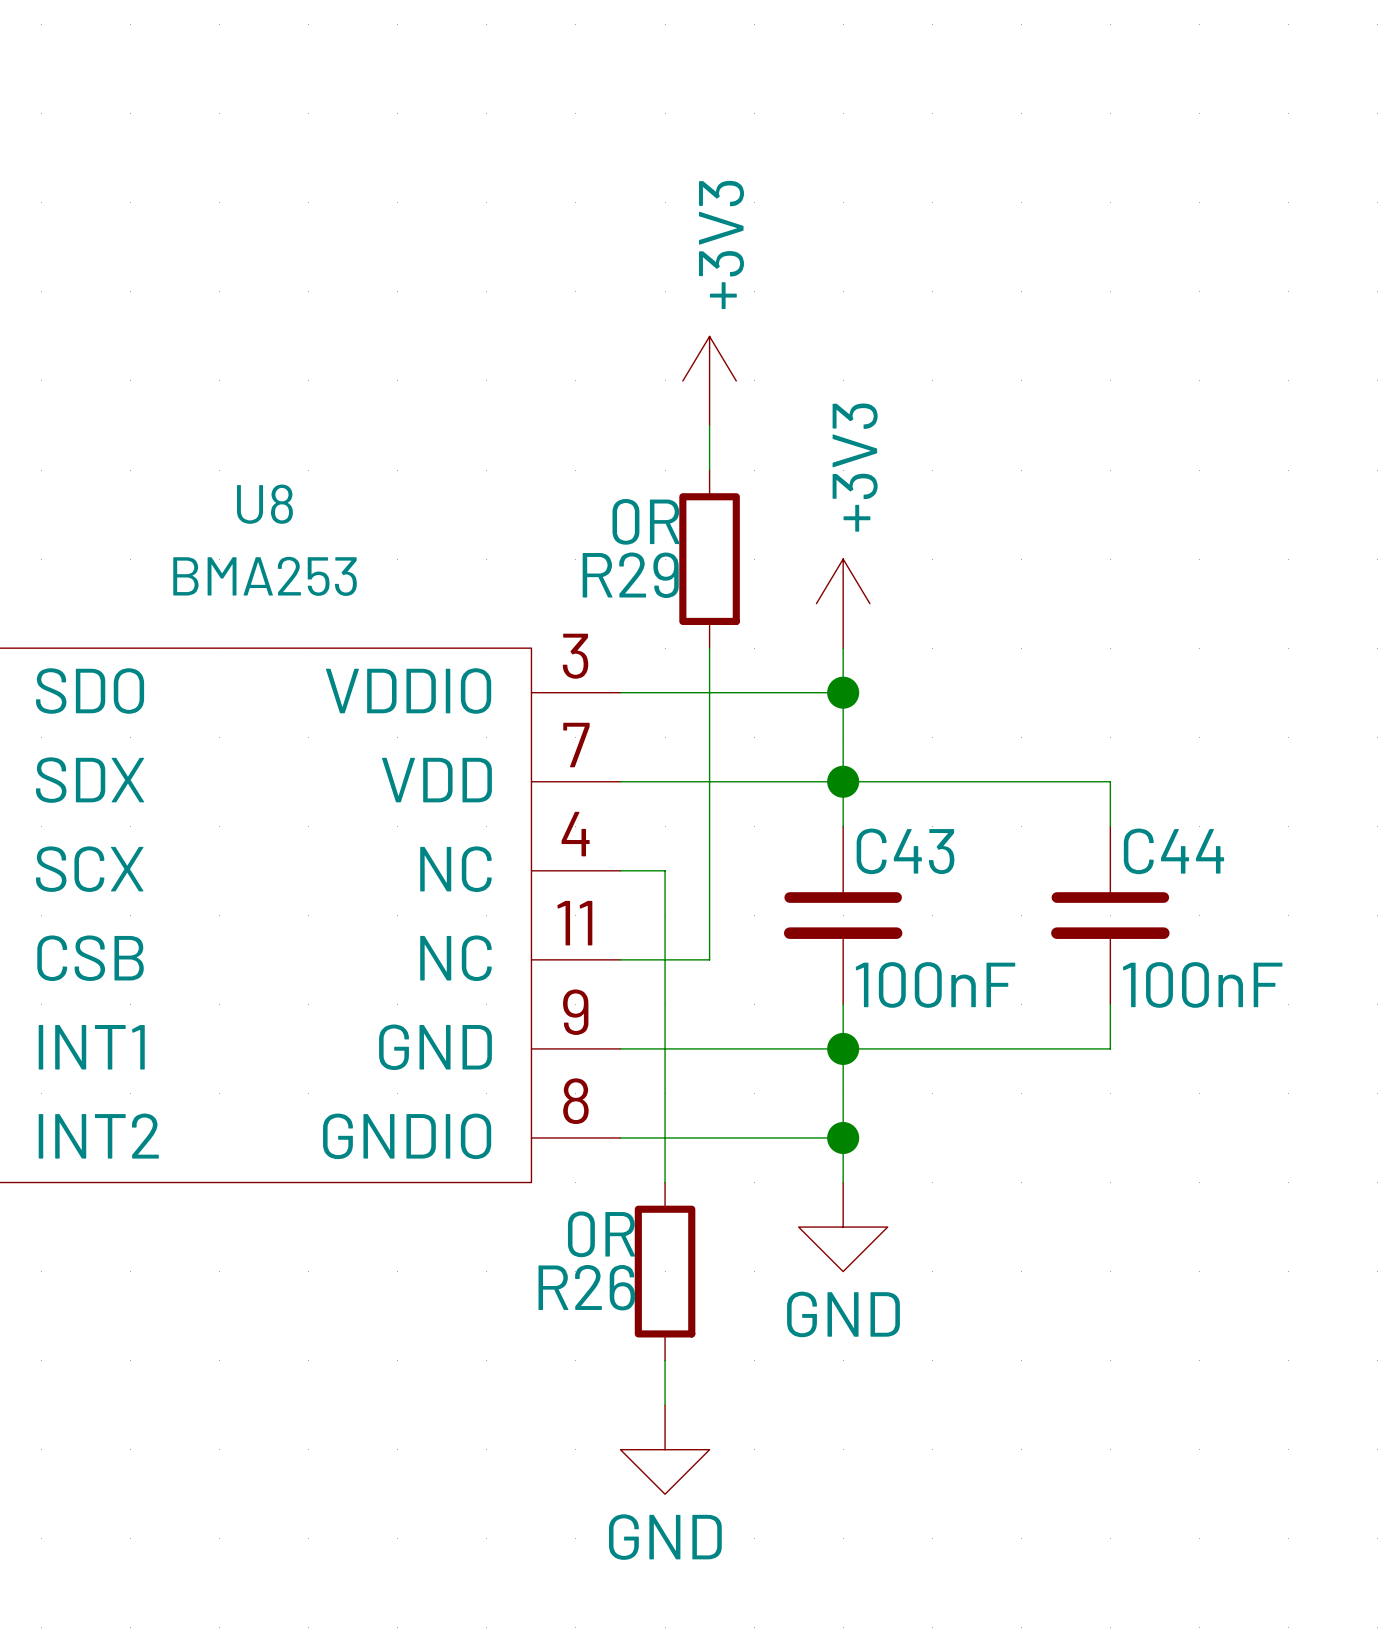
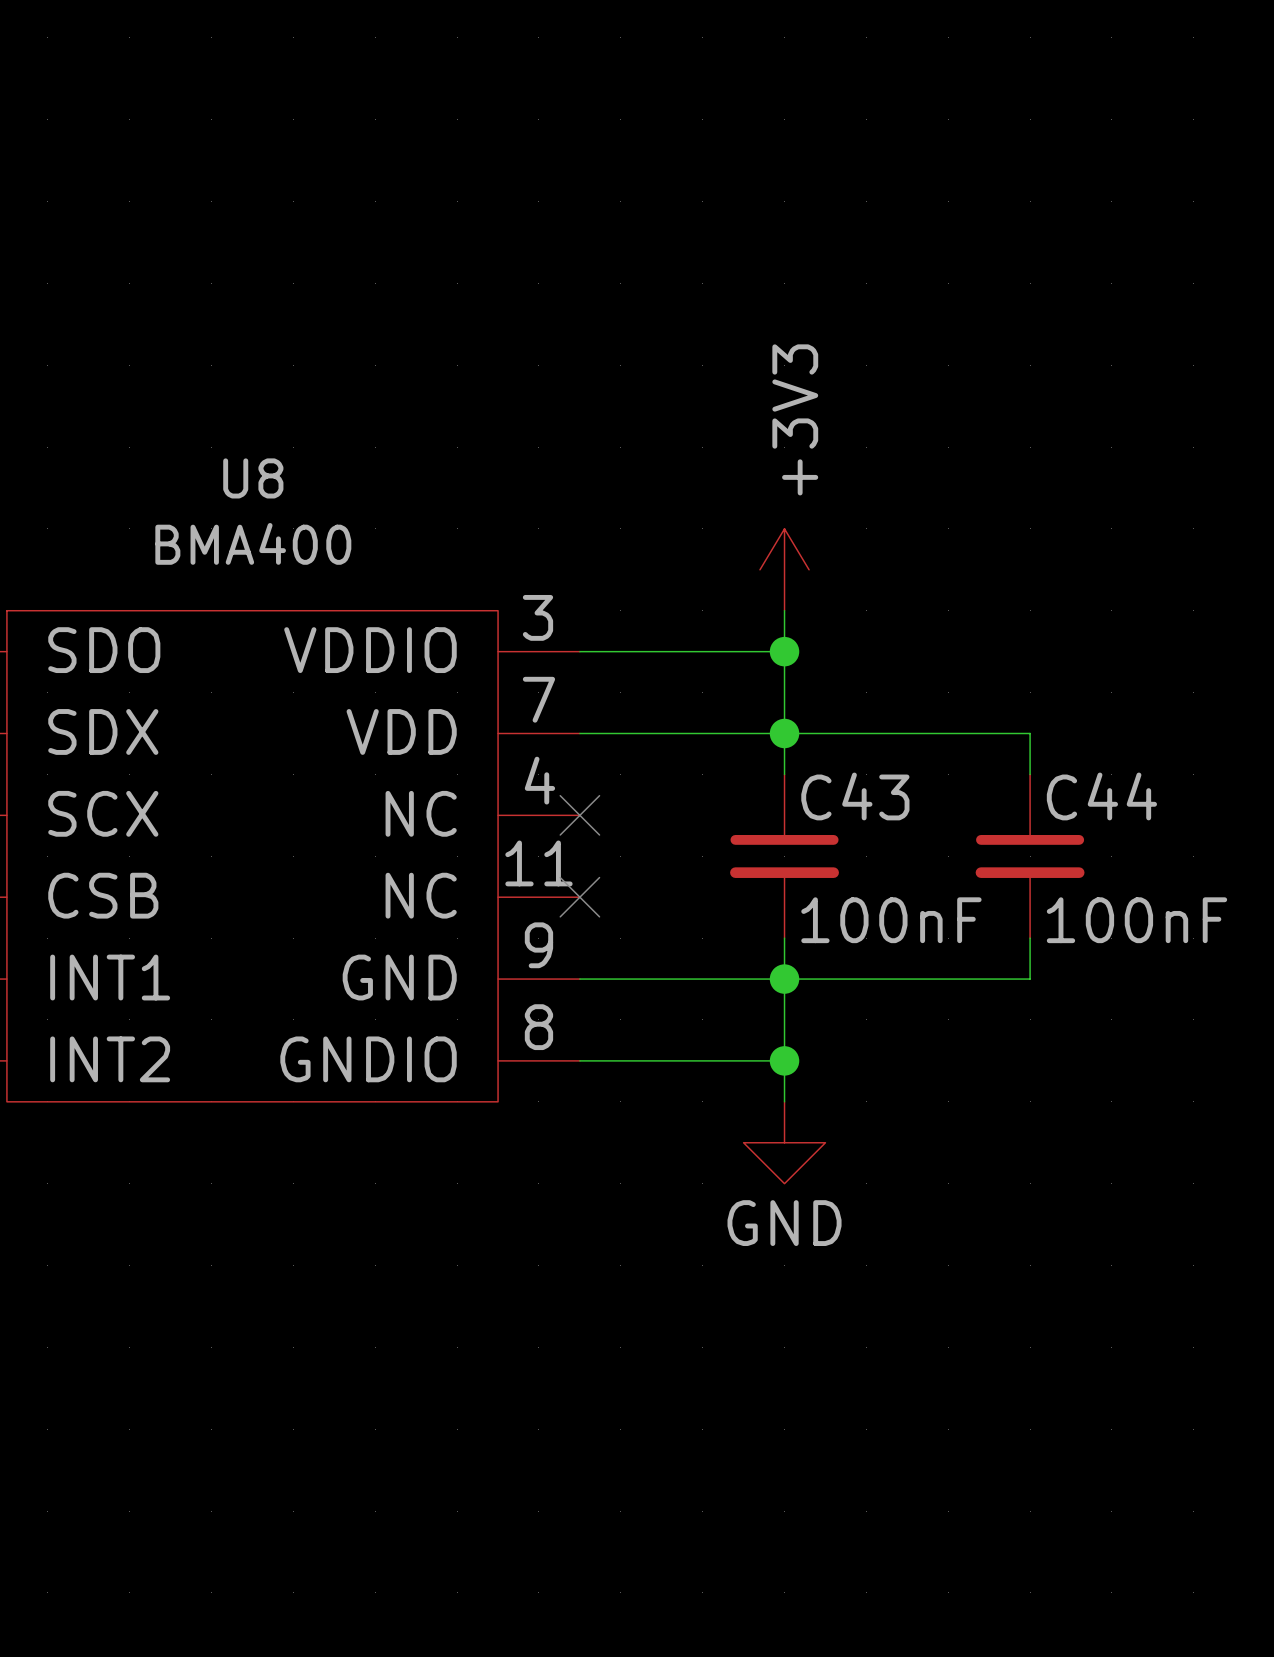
power symbol: +3V3 (709, 380) -> none
wire: (709, 425) (709, 470) -> none
R29: 0R (709, 559) -> none
U8 value: BMA253 (265, 576) -> BMA400 (253, 543)
wire: (709, 648) (709, 959) (620, 959) -> none
wire: (620, 870) (665, 870) (665, 1182) -> none
no-connect mark: none -> (579, 815)
no-connect mark: none -> (579, 897)
R26: 0R (665, 1271) -> none
wire: (665, 1360) (665, 1405) -> none
power symbol: GND (665, 1449) -> none

